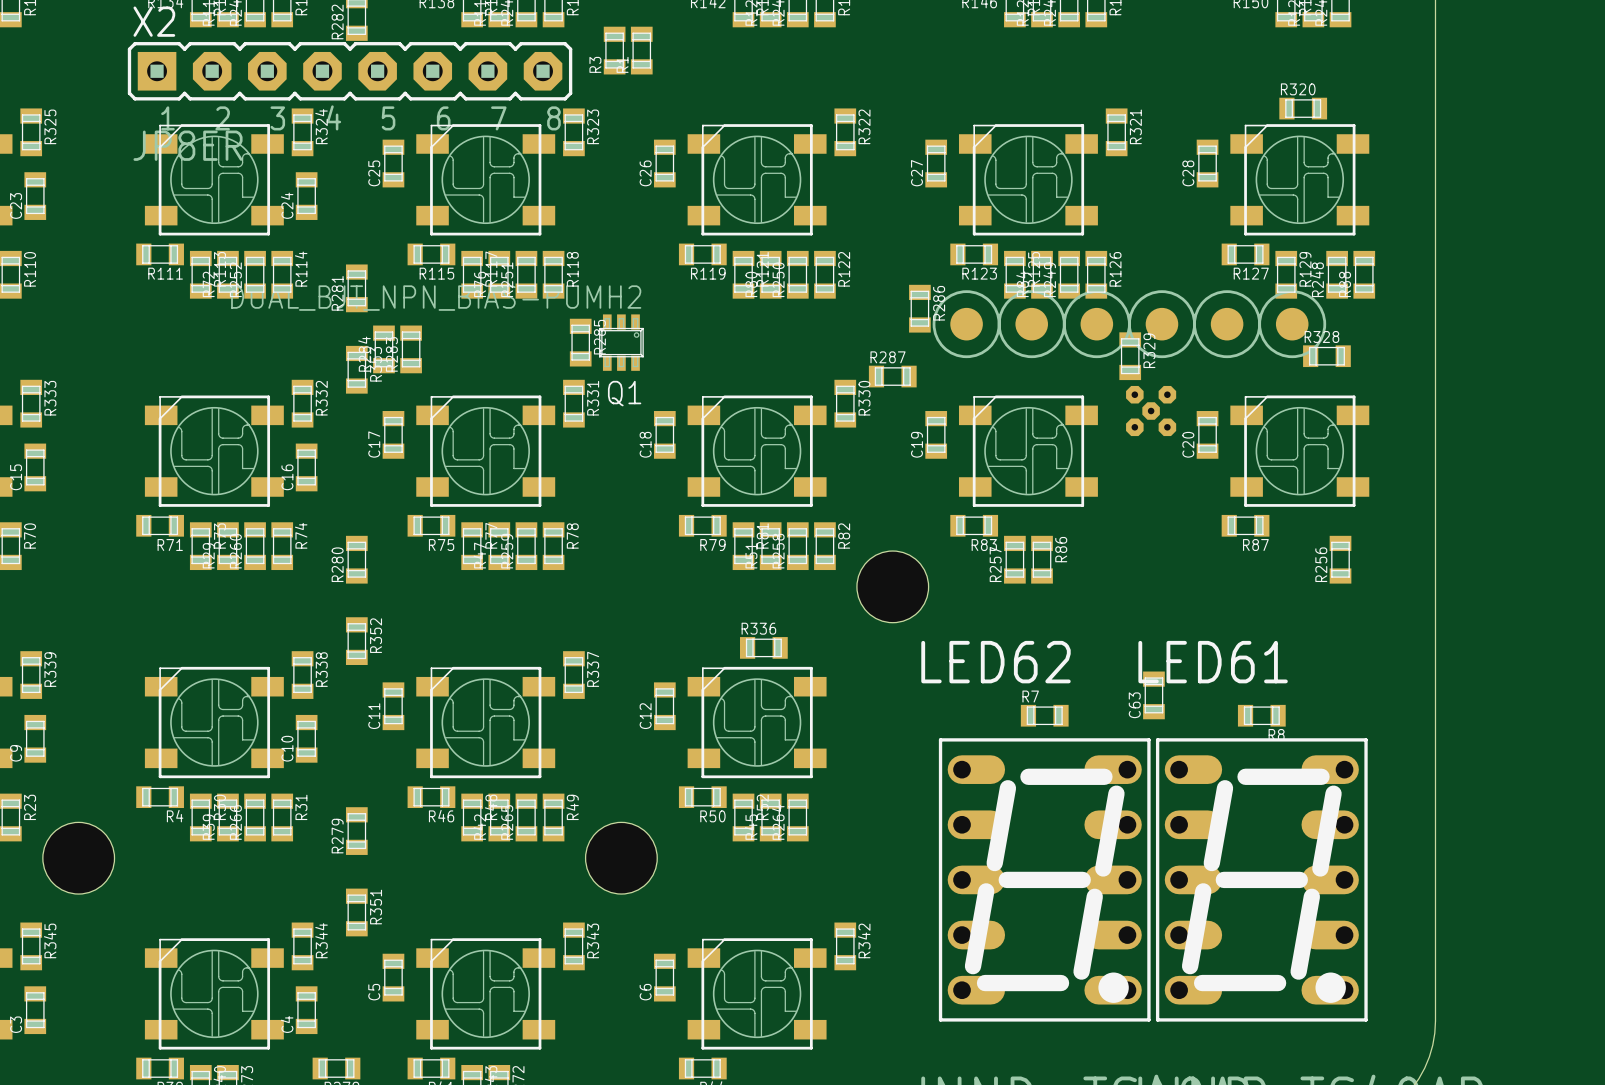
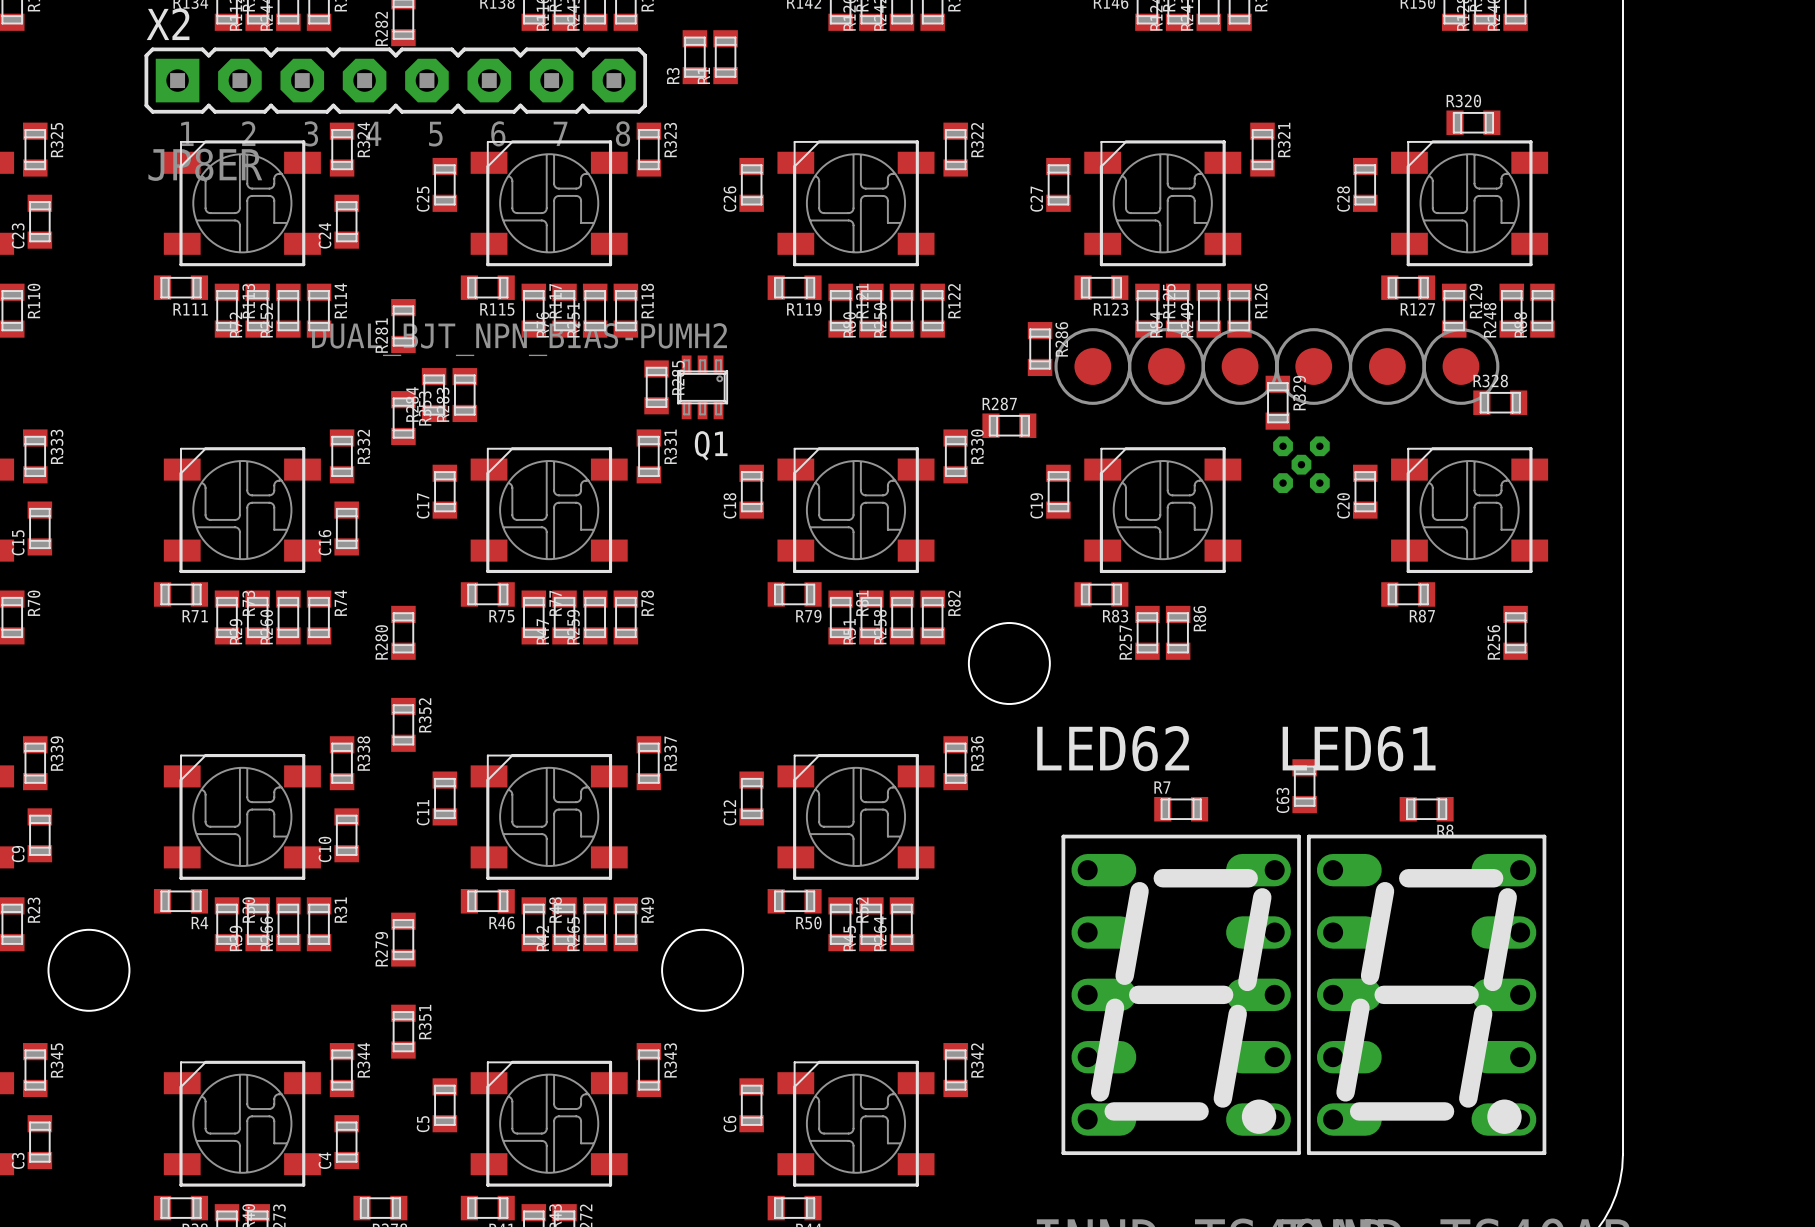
R336 rotation: 0° (763, 647) -> 90° clockwise (955, 763)
R336 position: (763, 647) -> (955, 763)

